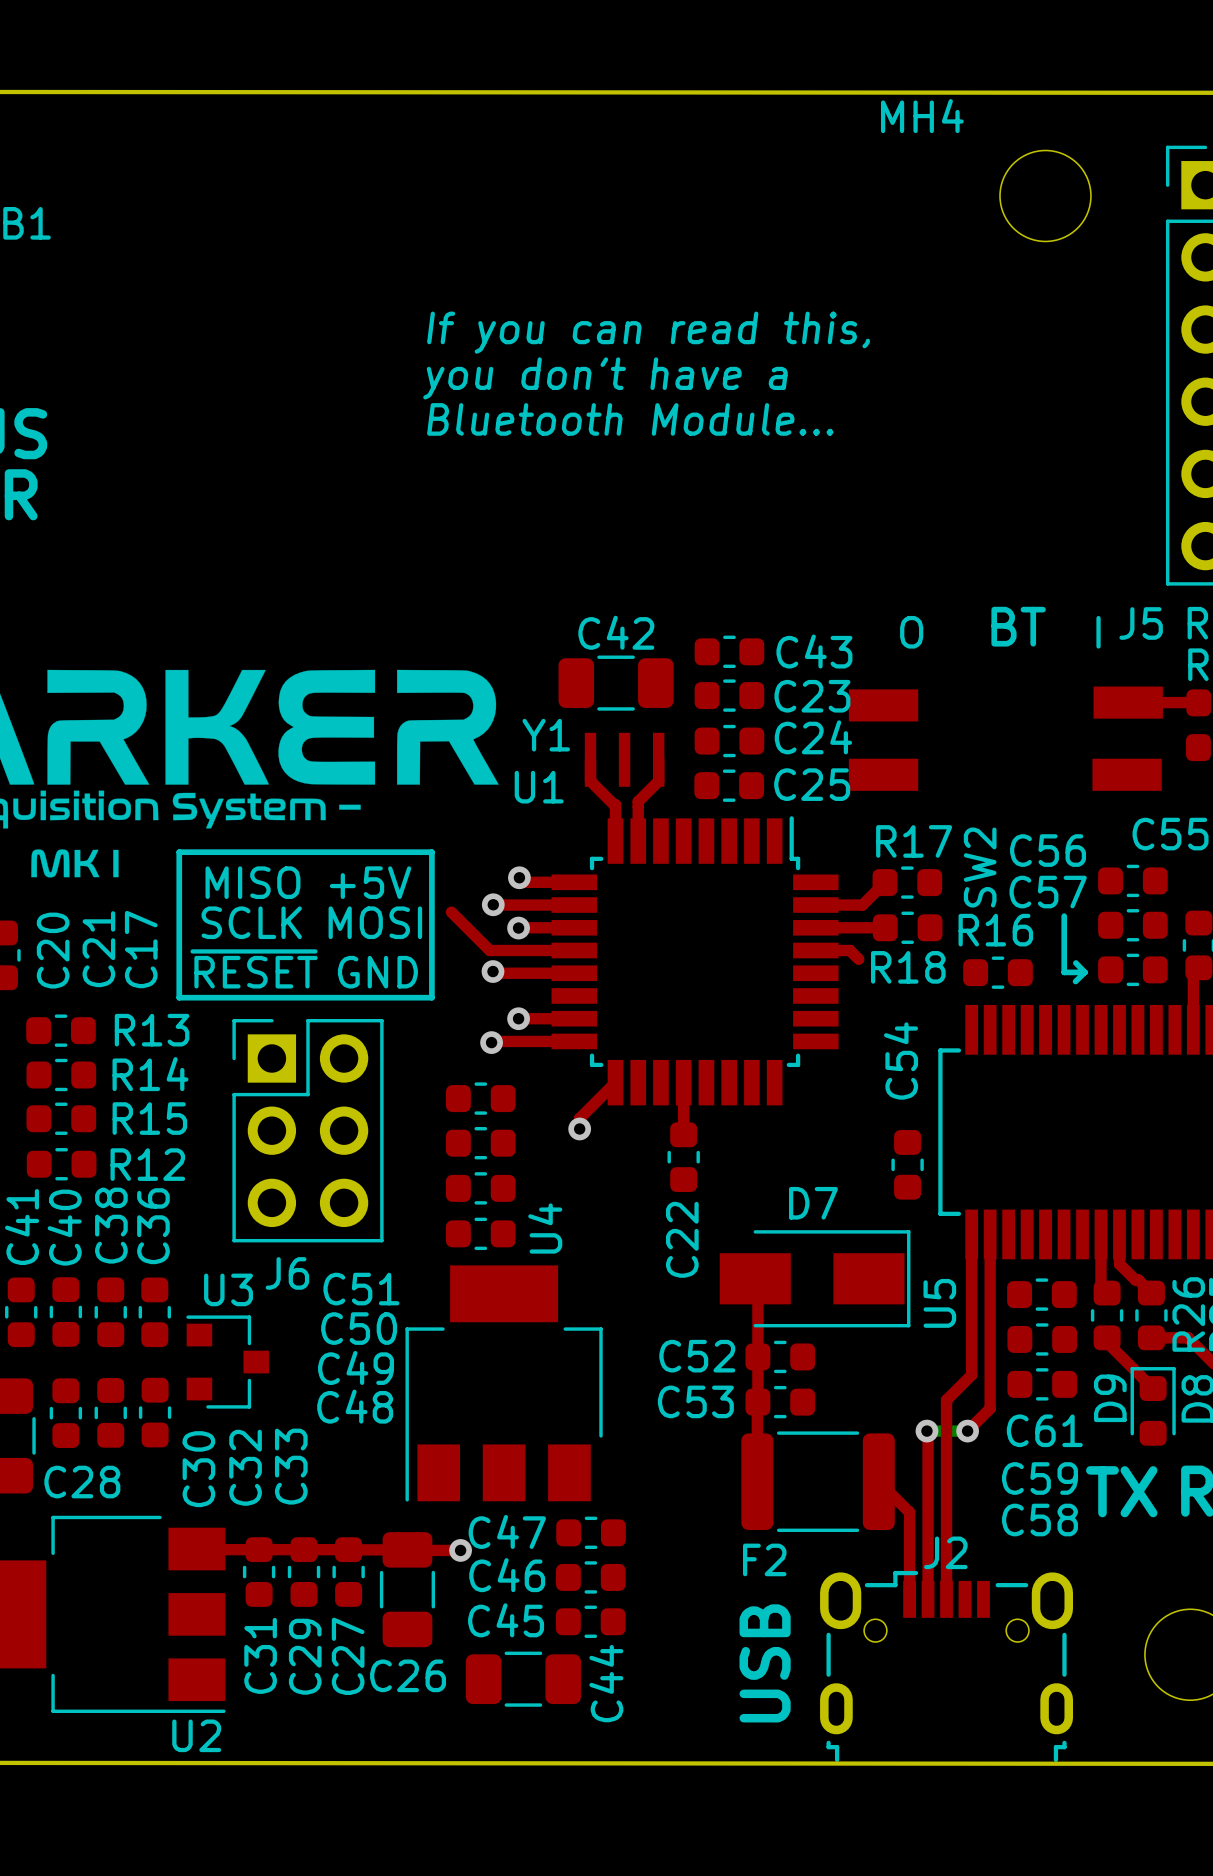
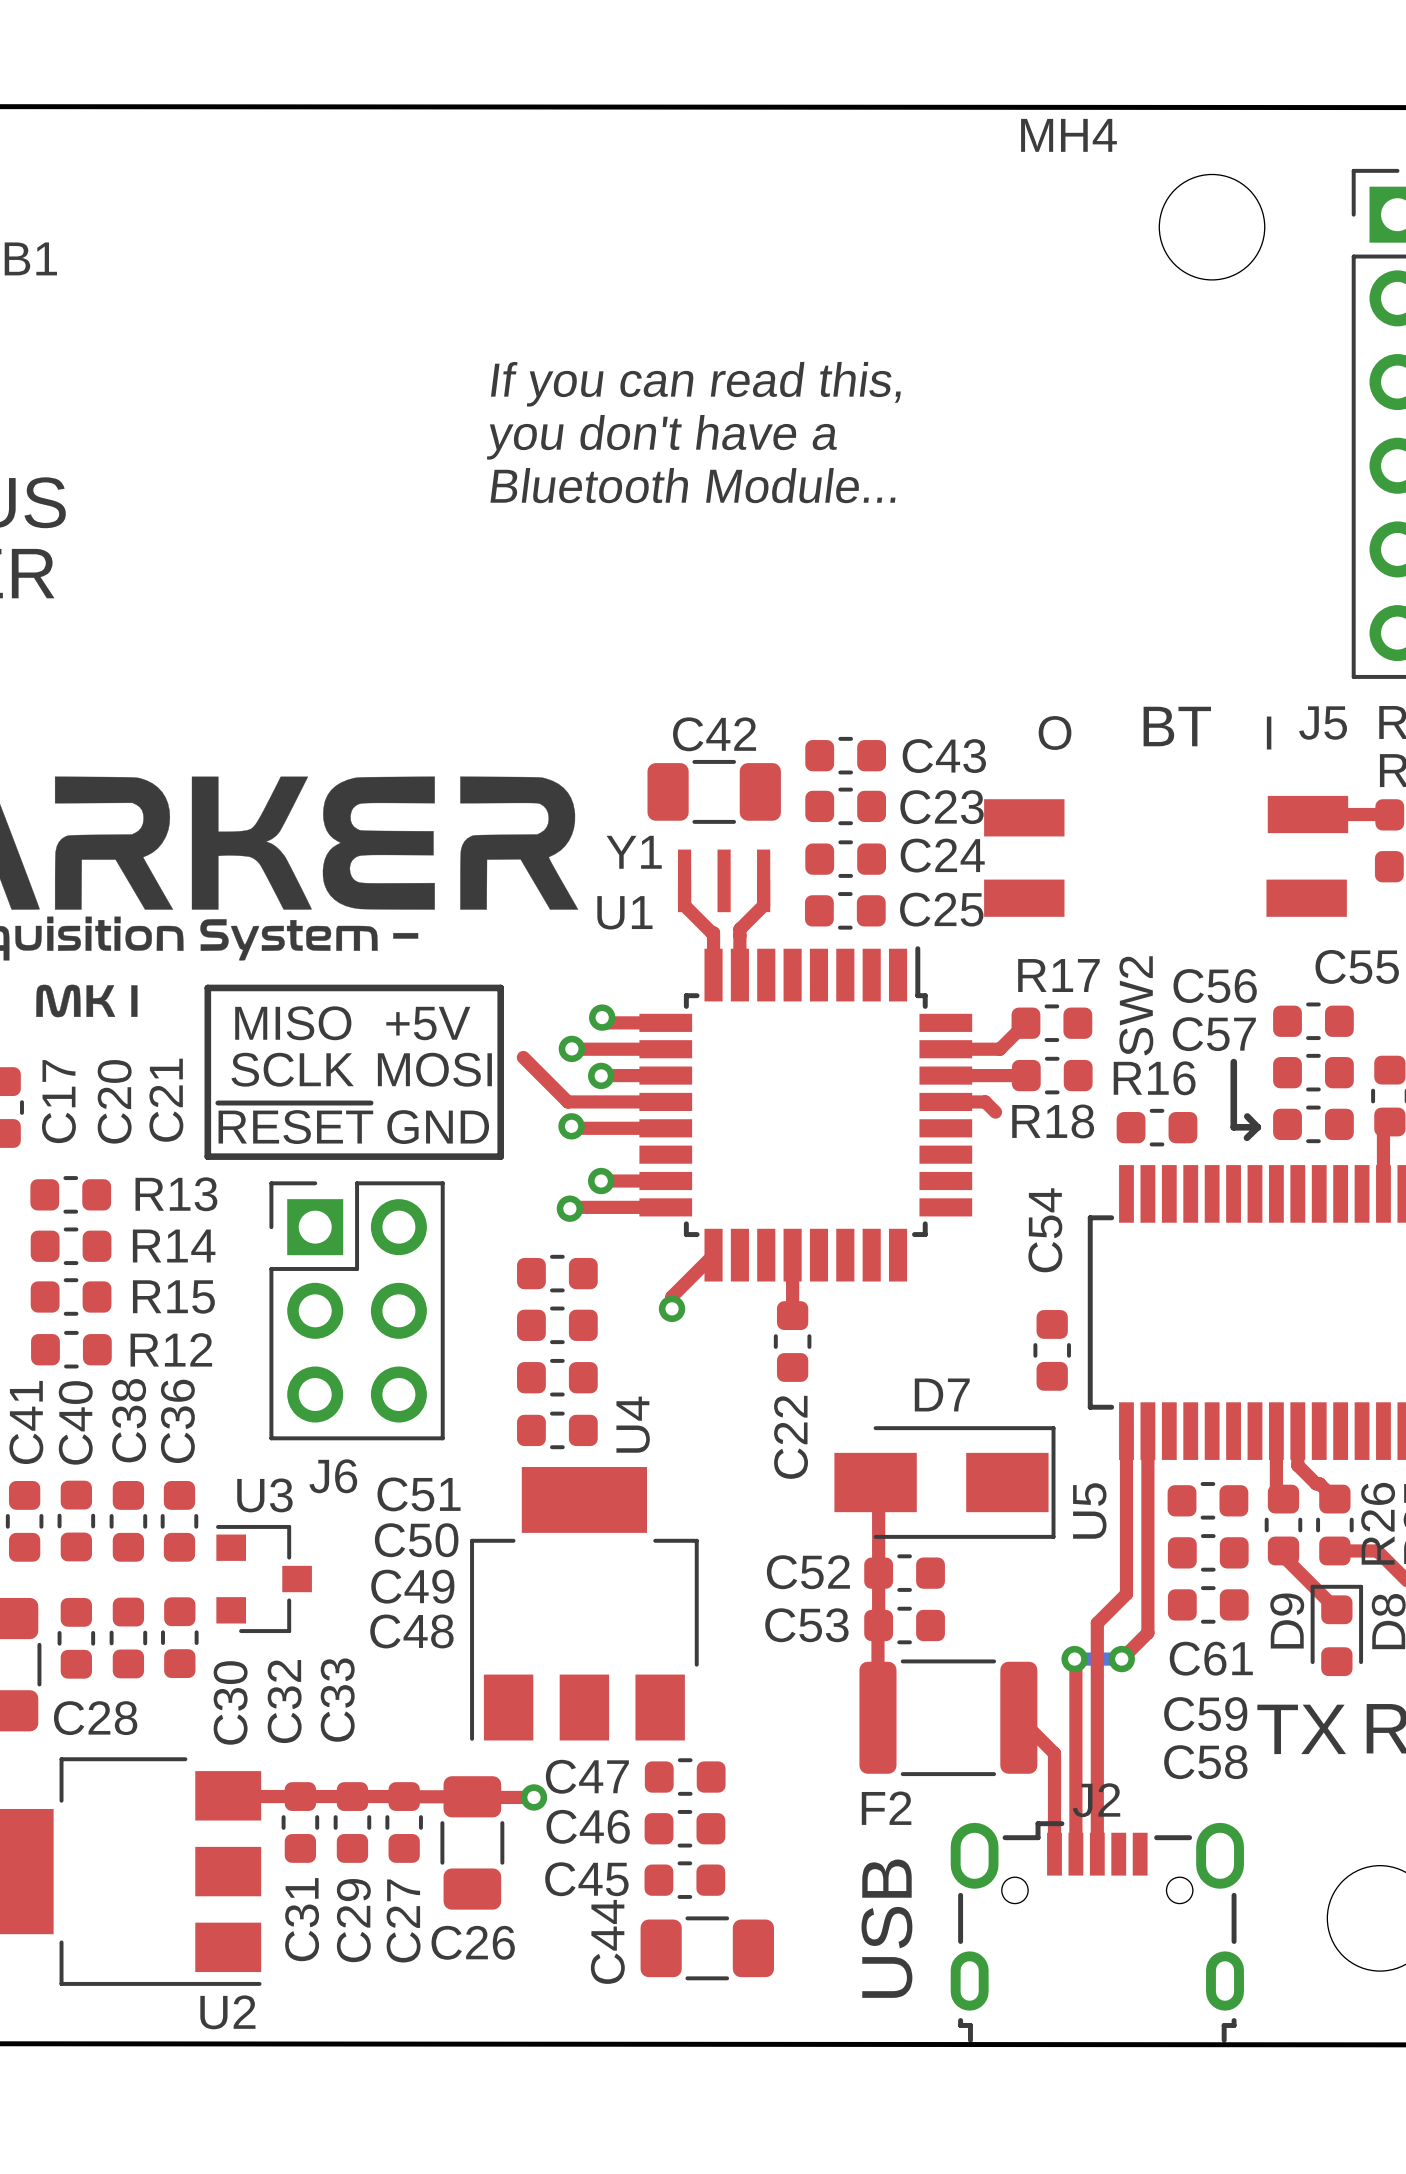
C21 name: C21 (98, 949) -> C20 (114, 1101)
C17 name: C17 (141, 949) -> C21 (166, 1100)
C20 name: C20 (53, 950) -> C17 (58, 1101)
C44 position: (523, 1679) -> (707, 1948)
C44 name position: C44 (606, 1683) -> C44 (607, 1941)

